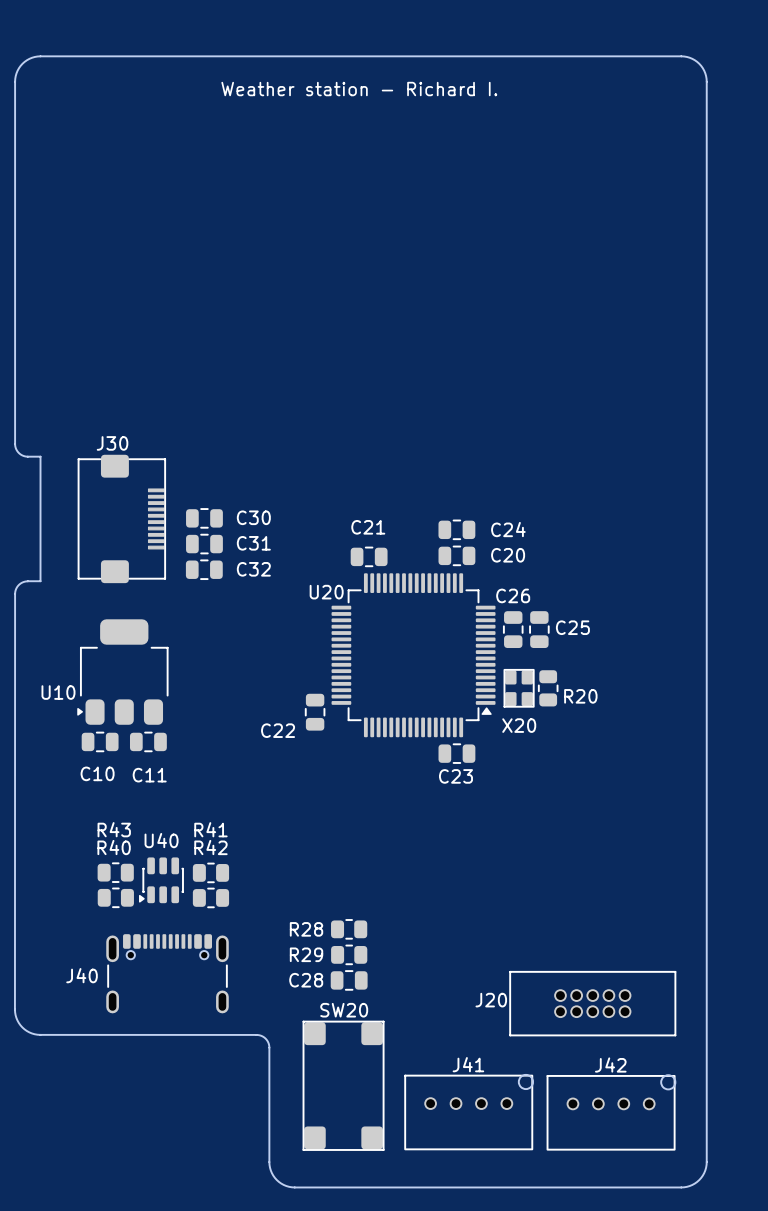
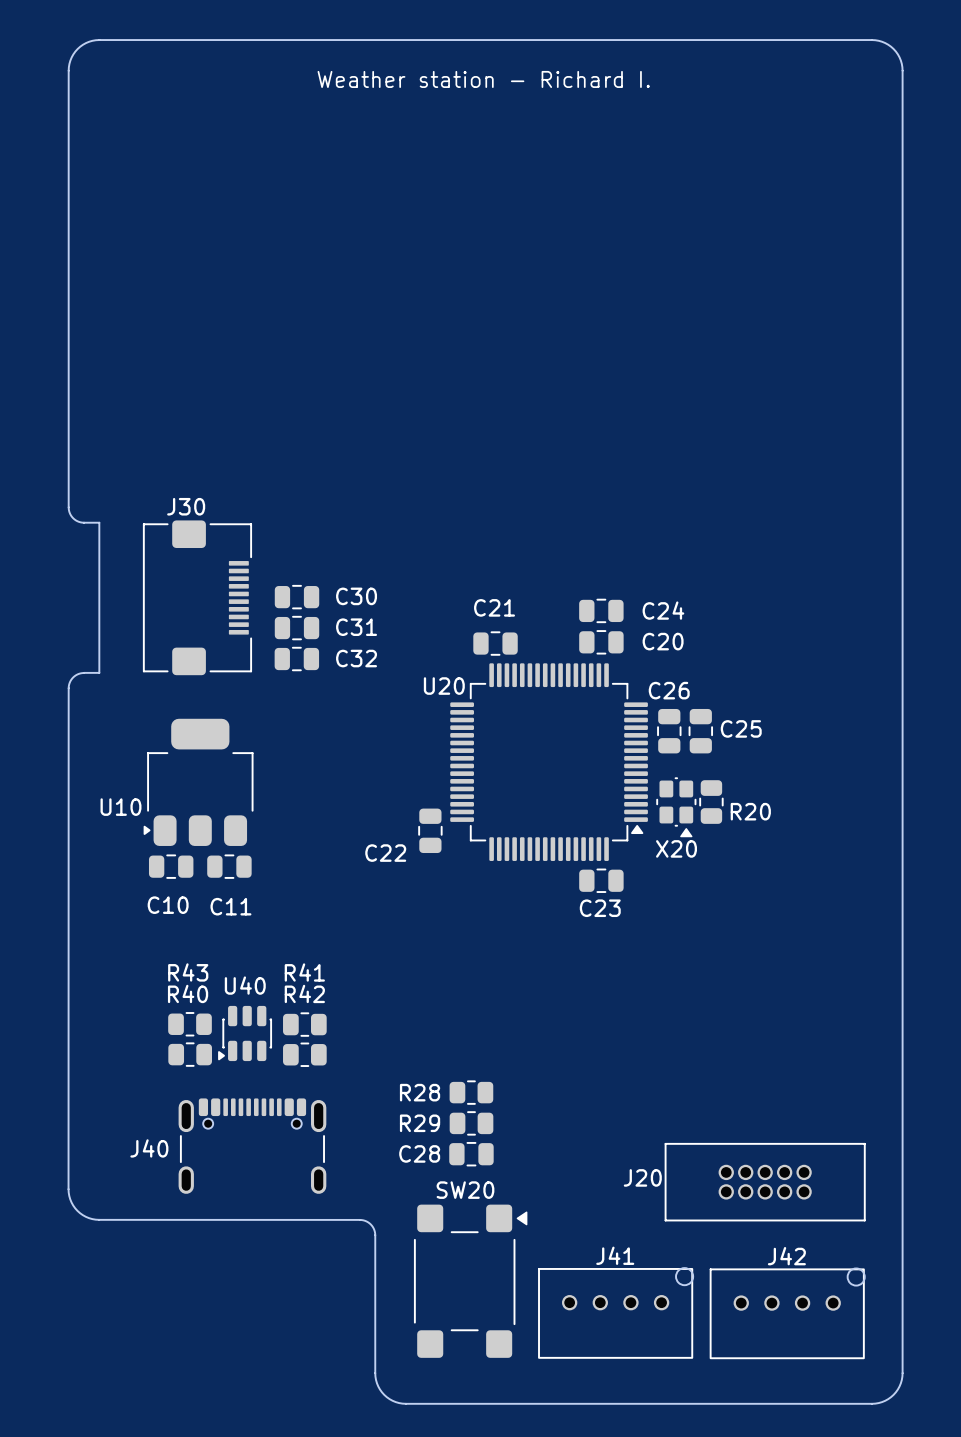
J30 footprint: [77, 454, 166, 584] -> [143, 520, 252, 676]
X20 footprint: [503, 669, 535, 708] -> [656, 777, 697, 838]
SW20 footprint: [302, 1020, 385, 1151] -> [414, 1204, 528, 1358]

